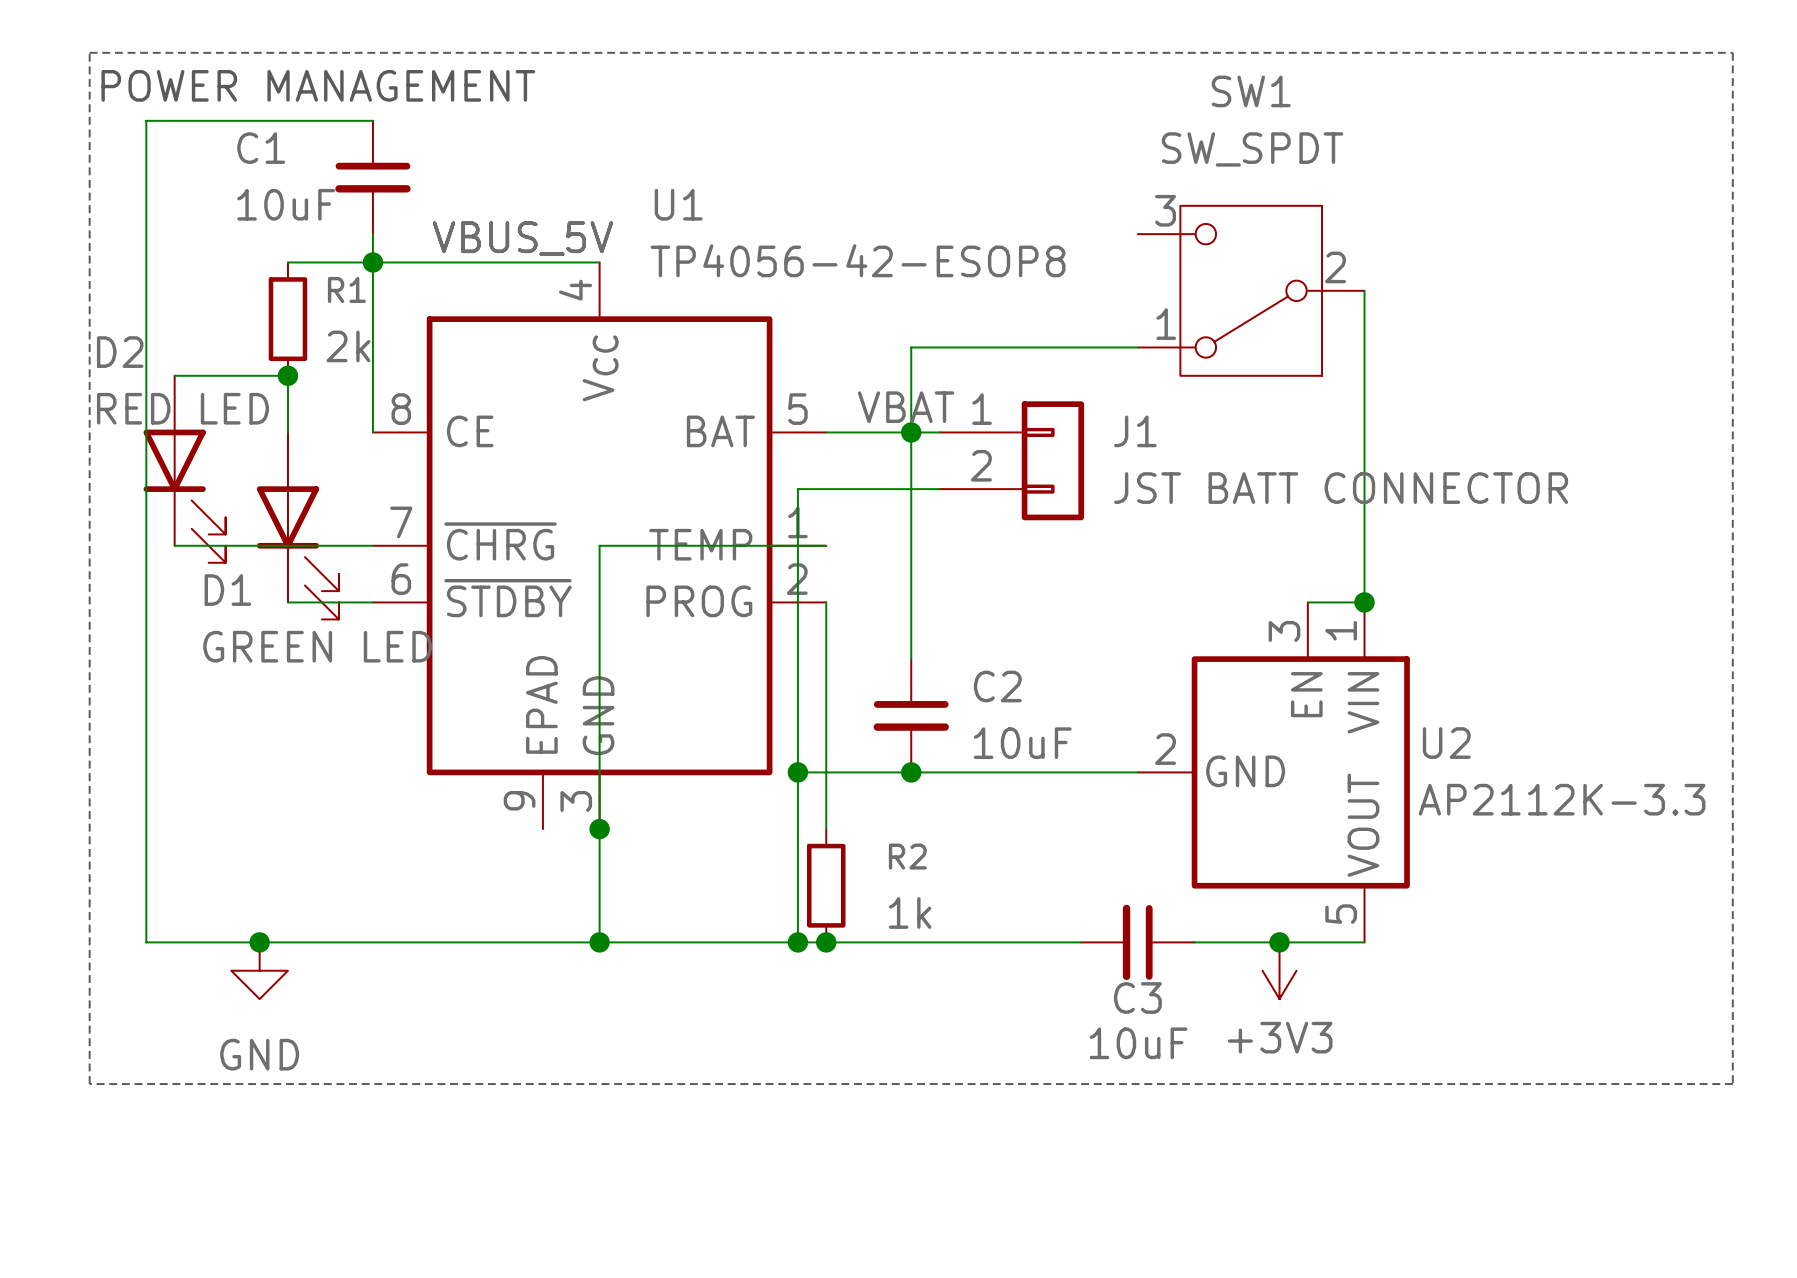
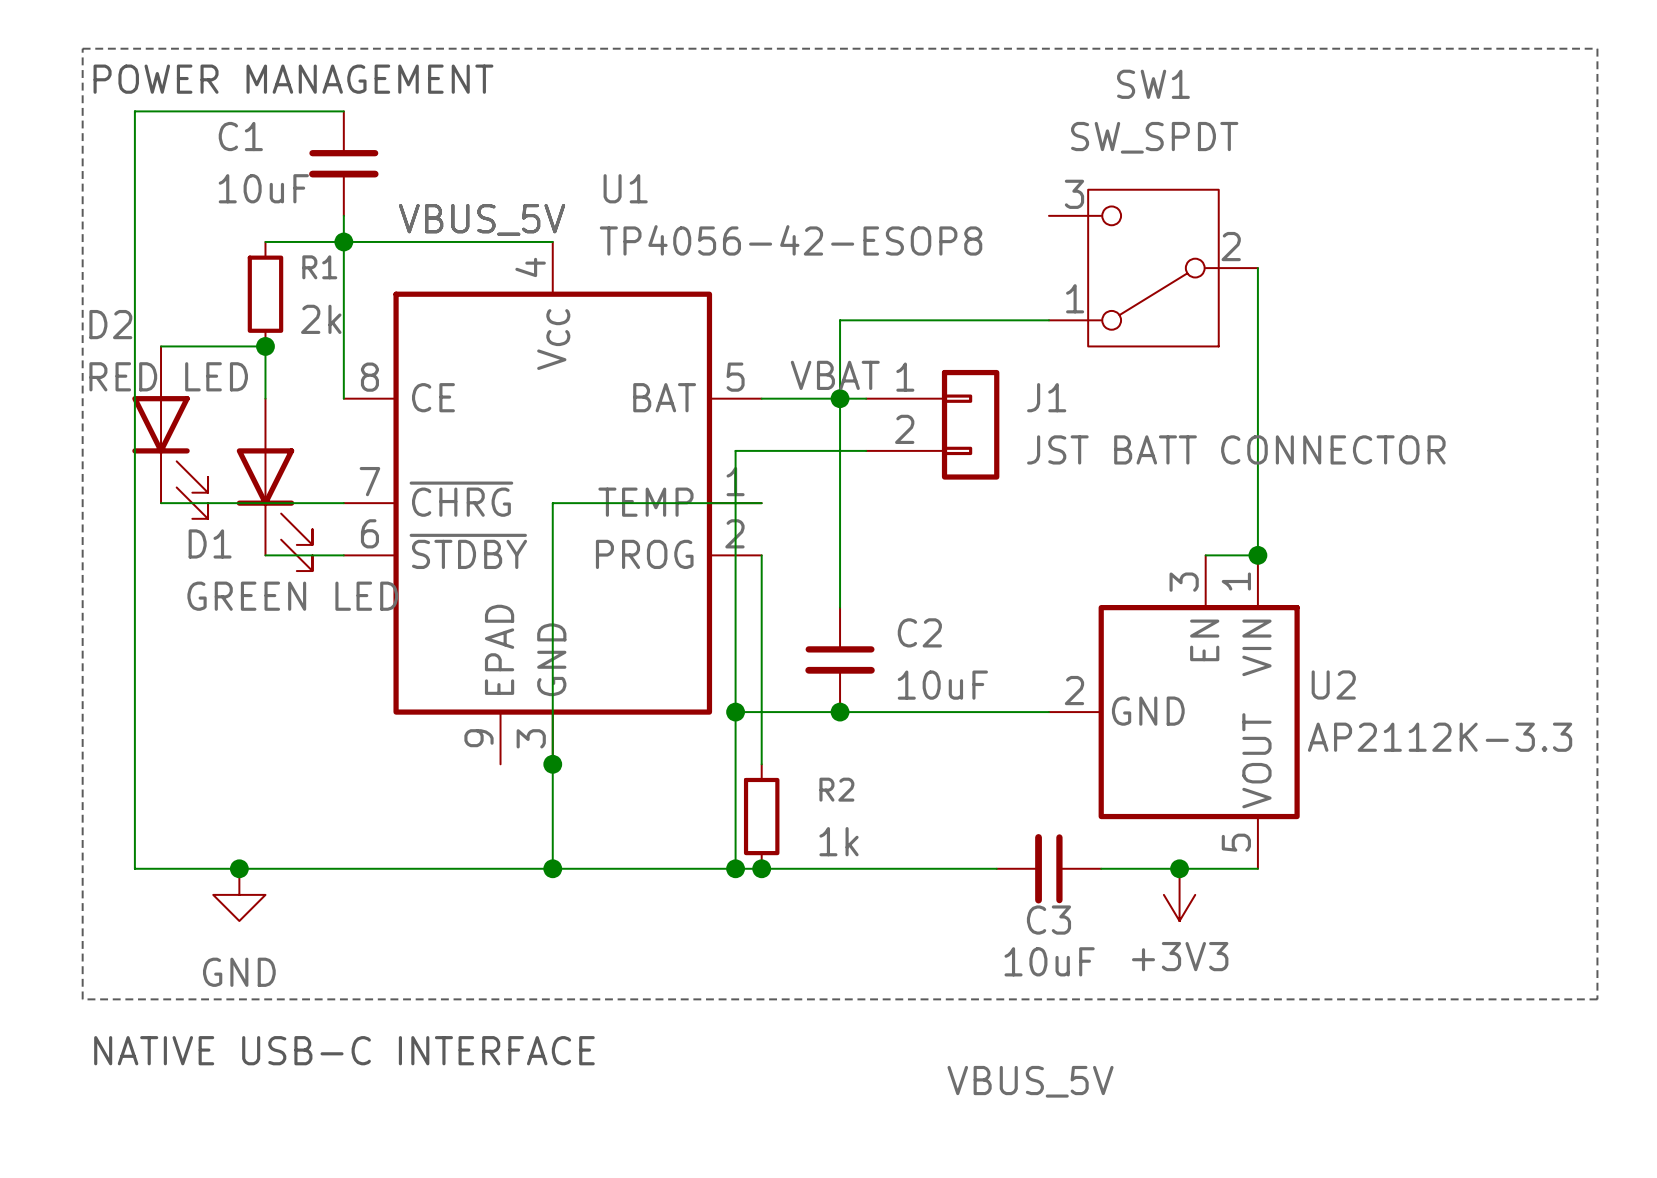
text: none -> NATIVE USB-C INTERFACE (344, 1050)
label: none -> VBUS_5V (1030, 1081)

